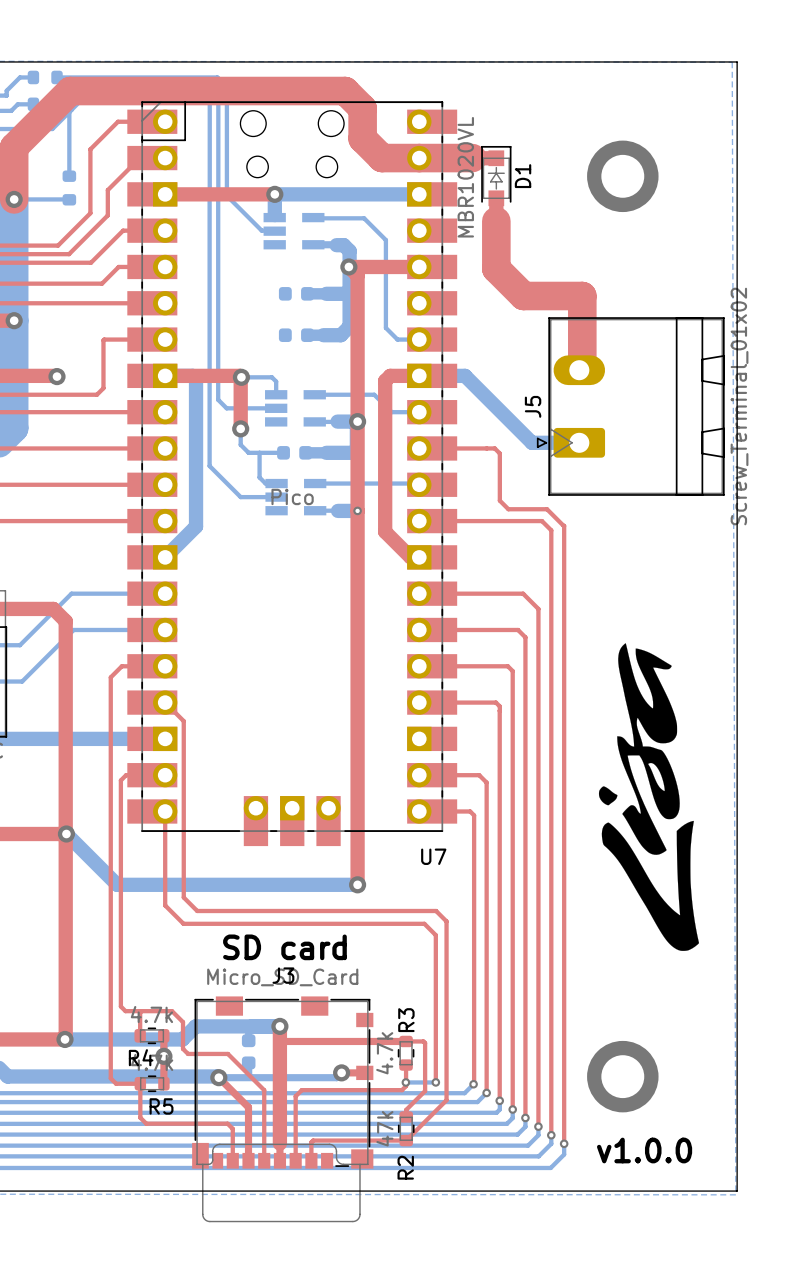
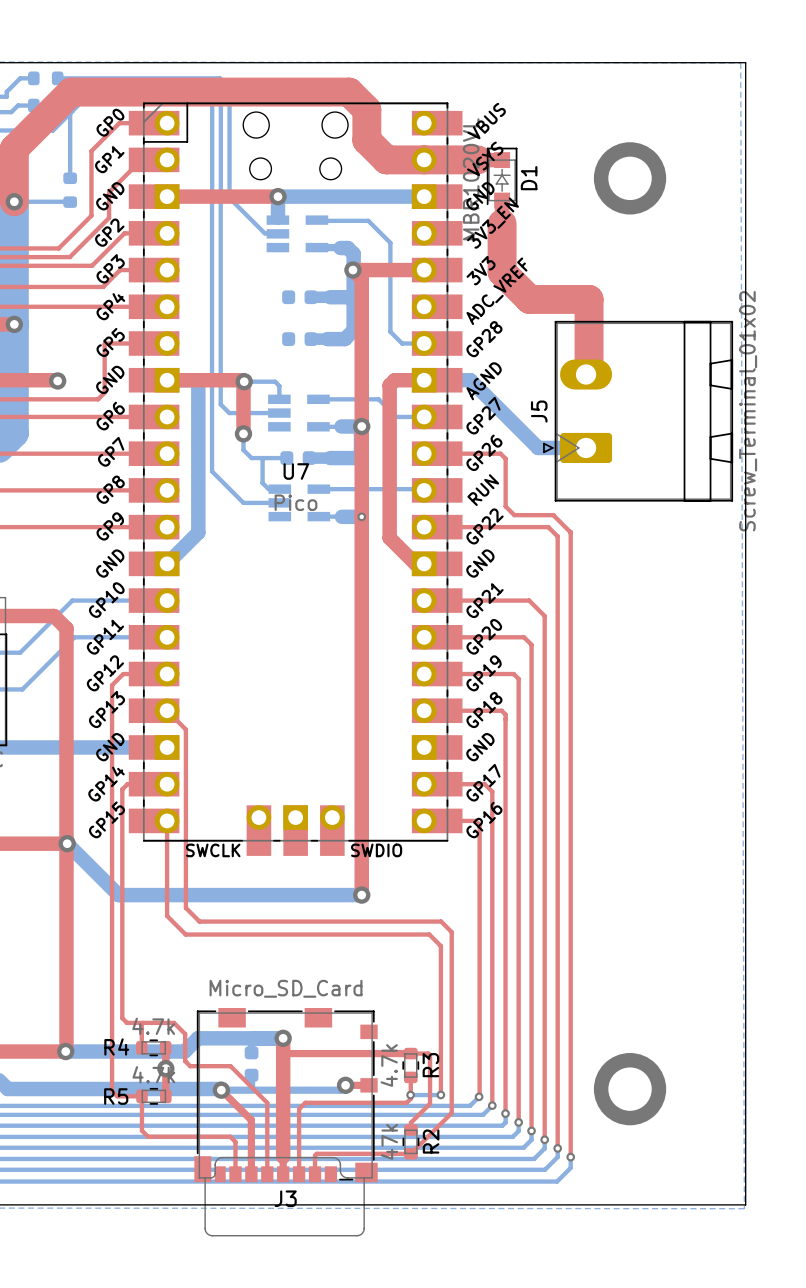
U7 footprint: [127, 101, 458, 847] -> [128, 102, 463, 856]
drawing: [598, 643, 700, 951] -> none
U7 name position: U7 (433, 856) -> U7 (296, 471)
text: SD card (284, 947) -> none
J3 name position: J3 (283, 975) -> J3 (285, 1198)
R3 name position: R3 (406, 1020) -> R3 (430, 1065)
R4 name position: R4 (141, 1057) -> R4 (116, 1046)
R5 name position: R5 (161, 1106) -> R5 (116, 1096)
text: v1.0.0 (644, 1150) -> none
R2 name position: R2 (405, 1167) -> R2 (431, 1141)

